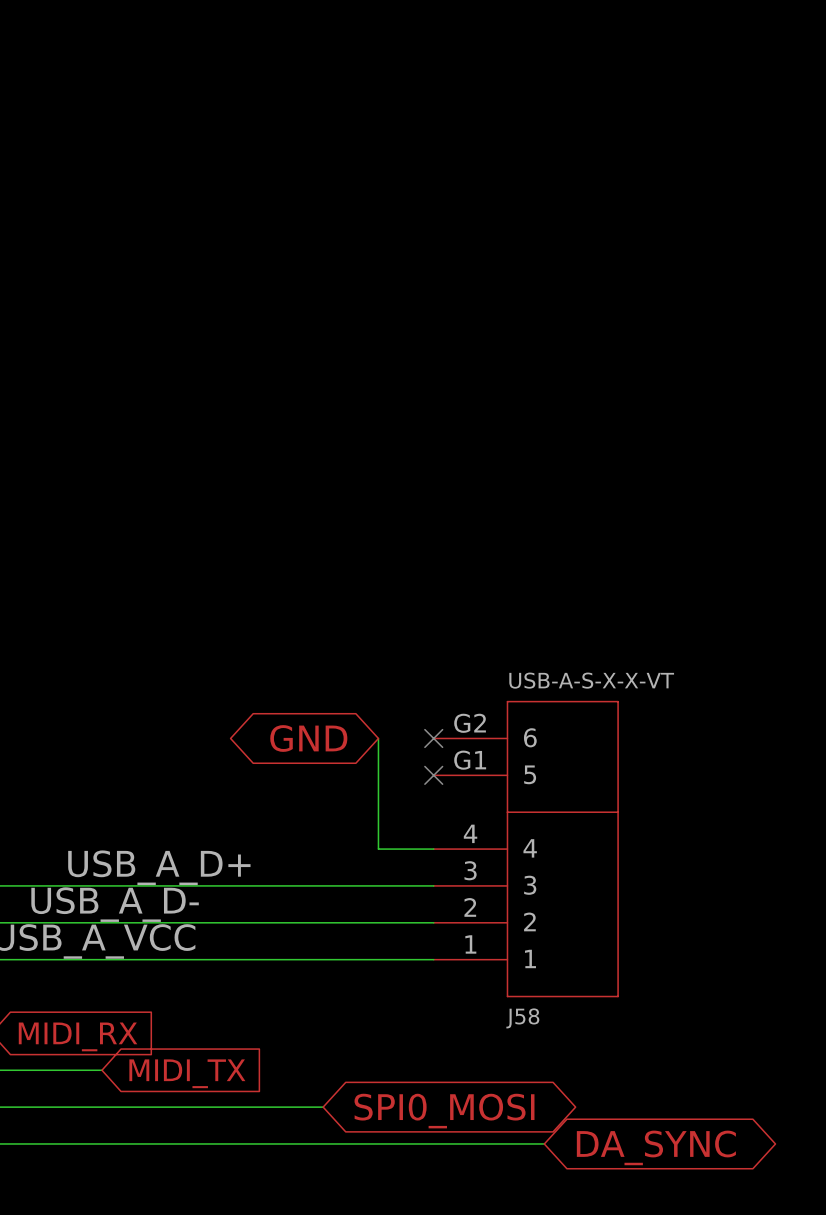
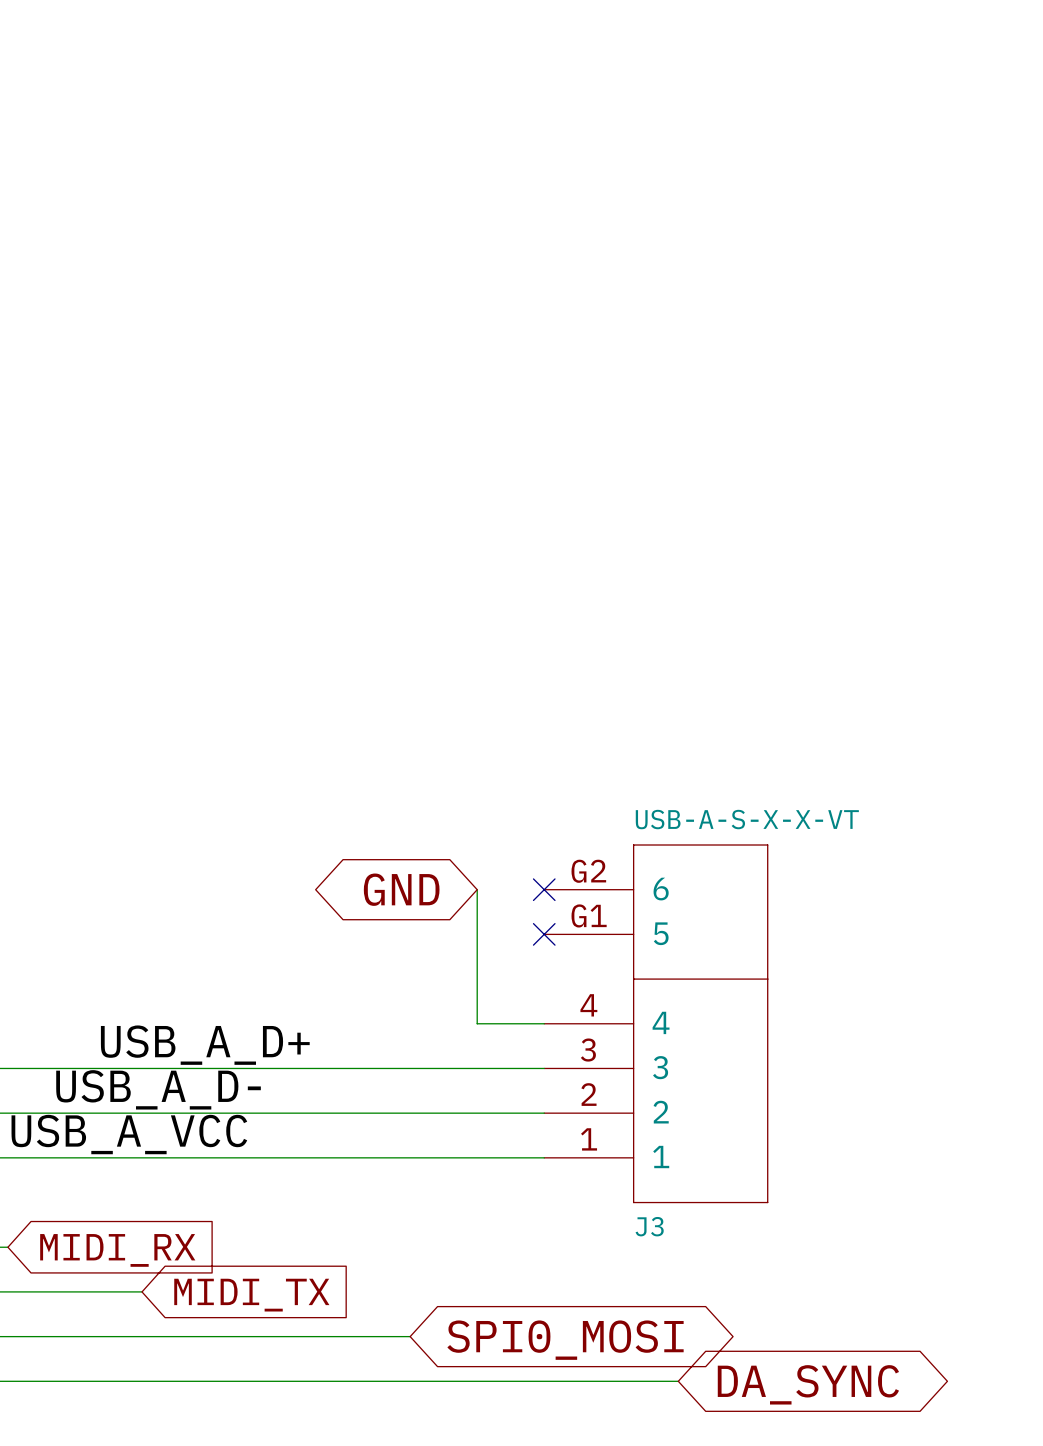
J58 name: J58 (522, 1018) -> J3 (649, 1226)

